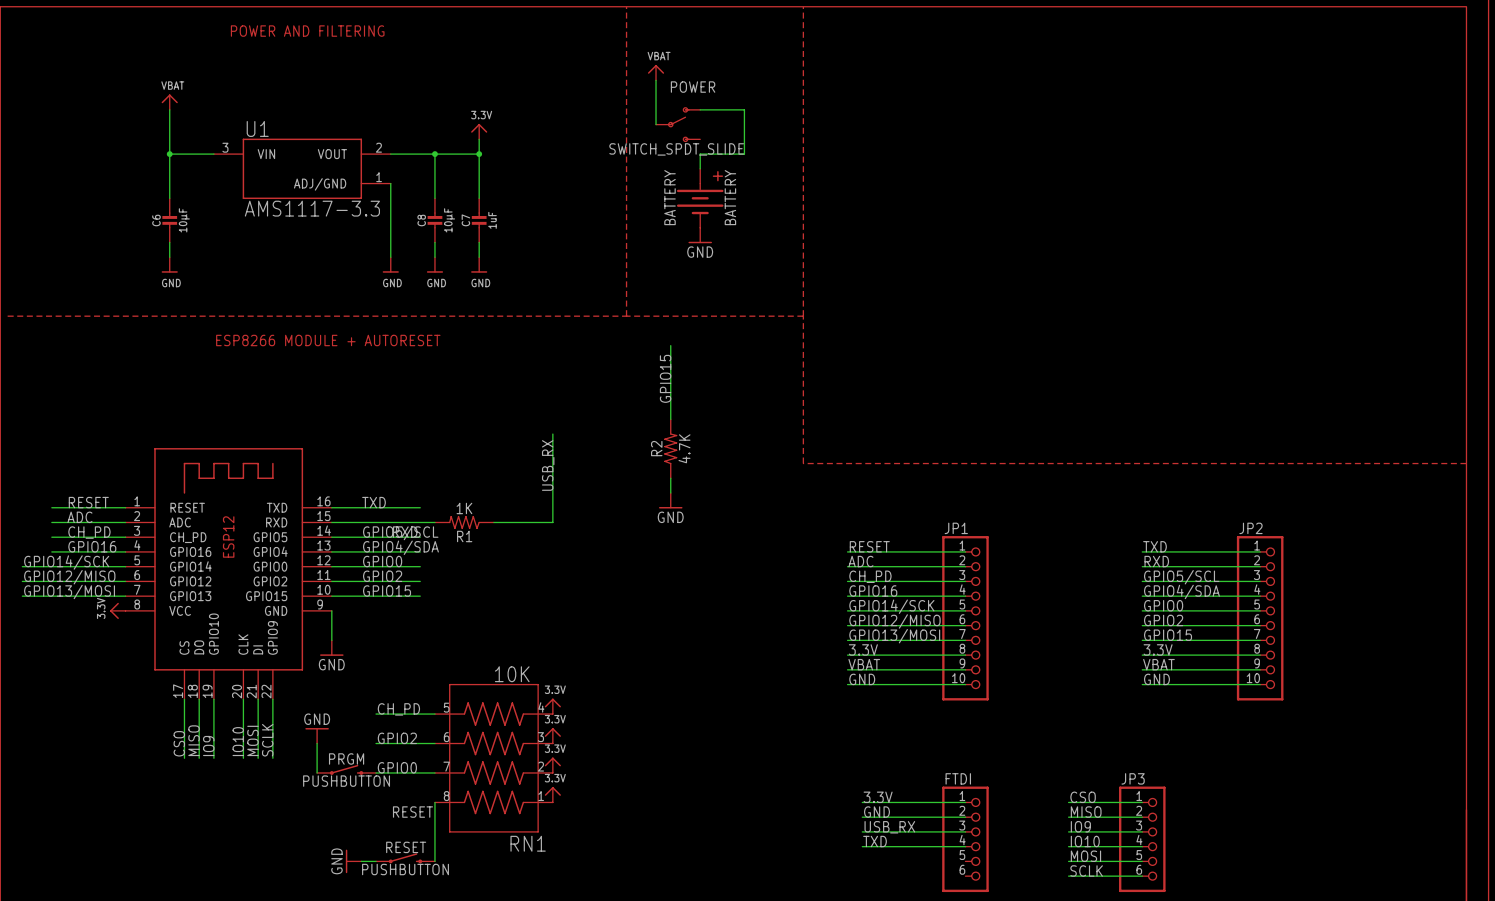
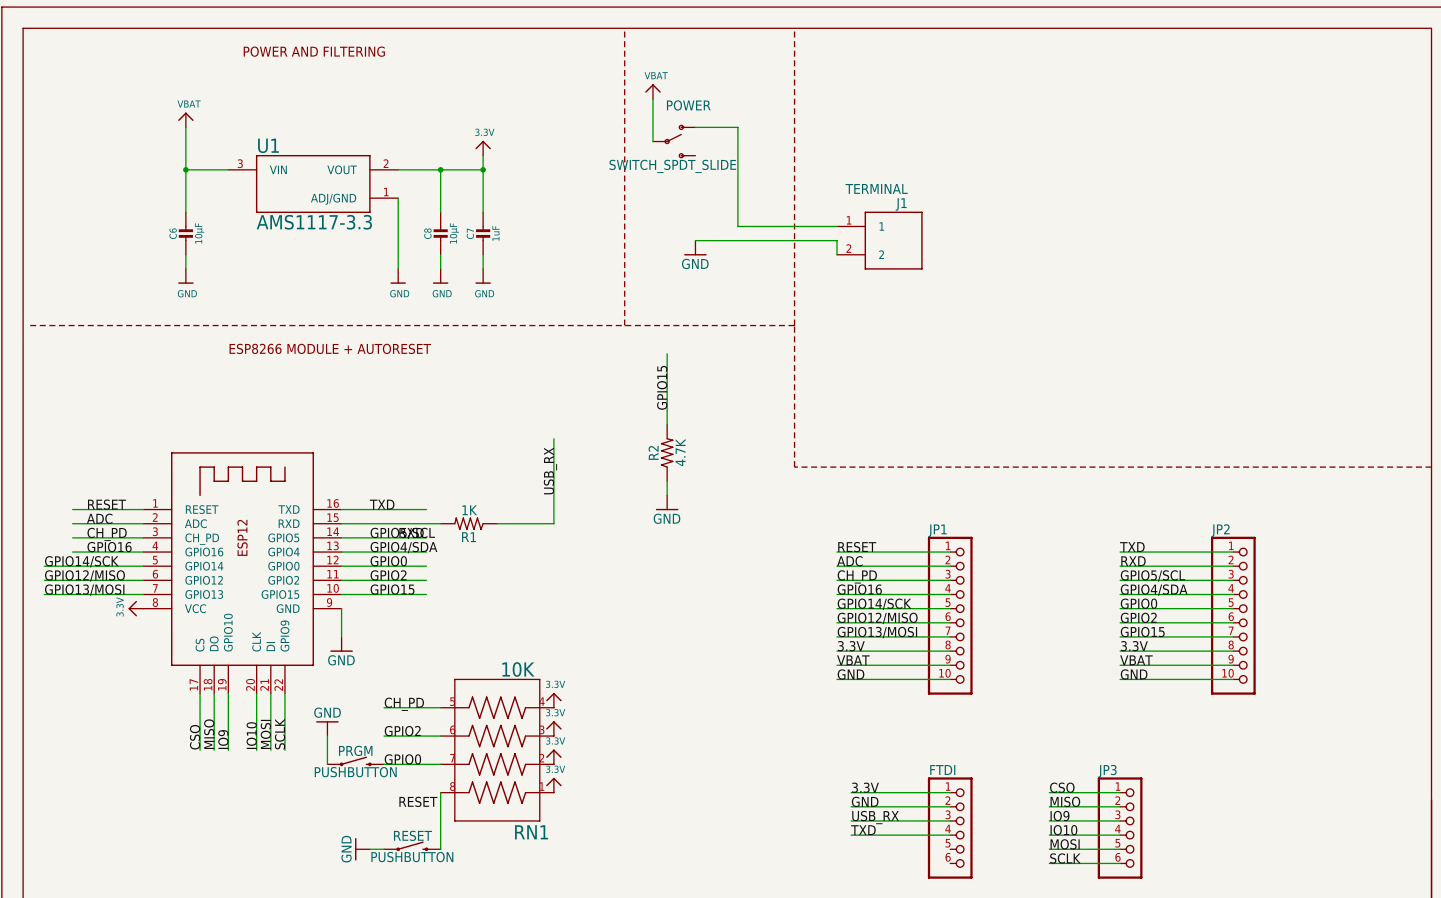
wire: (744, 154) (700, 154) (700, 168) -> (737, 169) (737, 226) (837, 226)
BATTERY: BATTERY (700, 198) -> none
wire: none -> (695, 240) (837, 240) (837, 254)
J1: none -> TERMINAL (879, 240)

